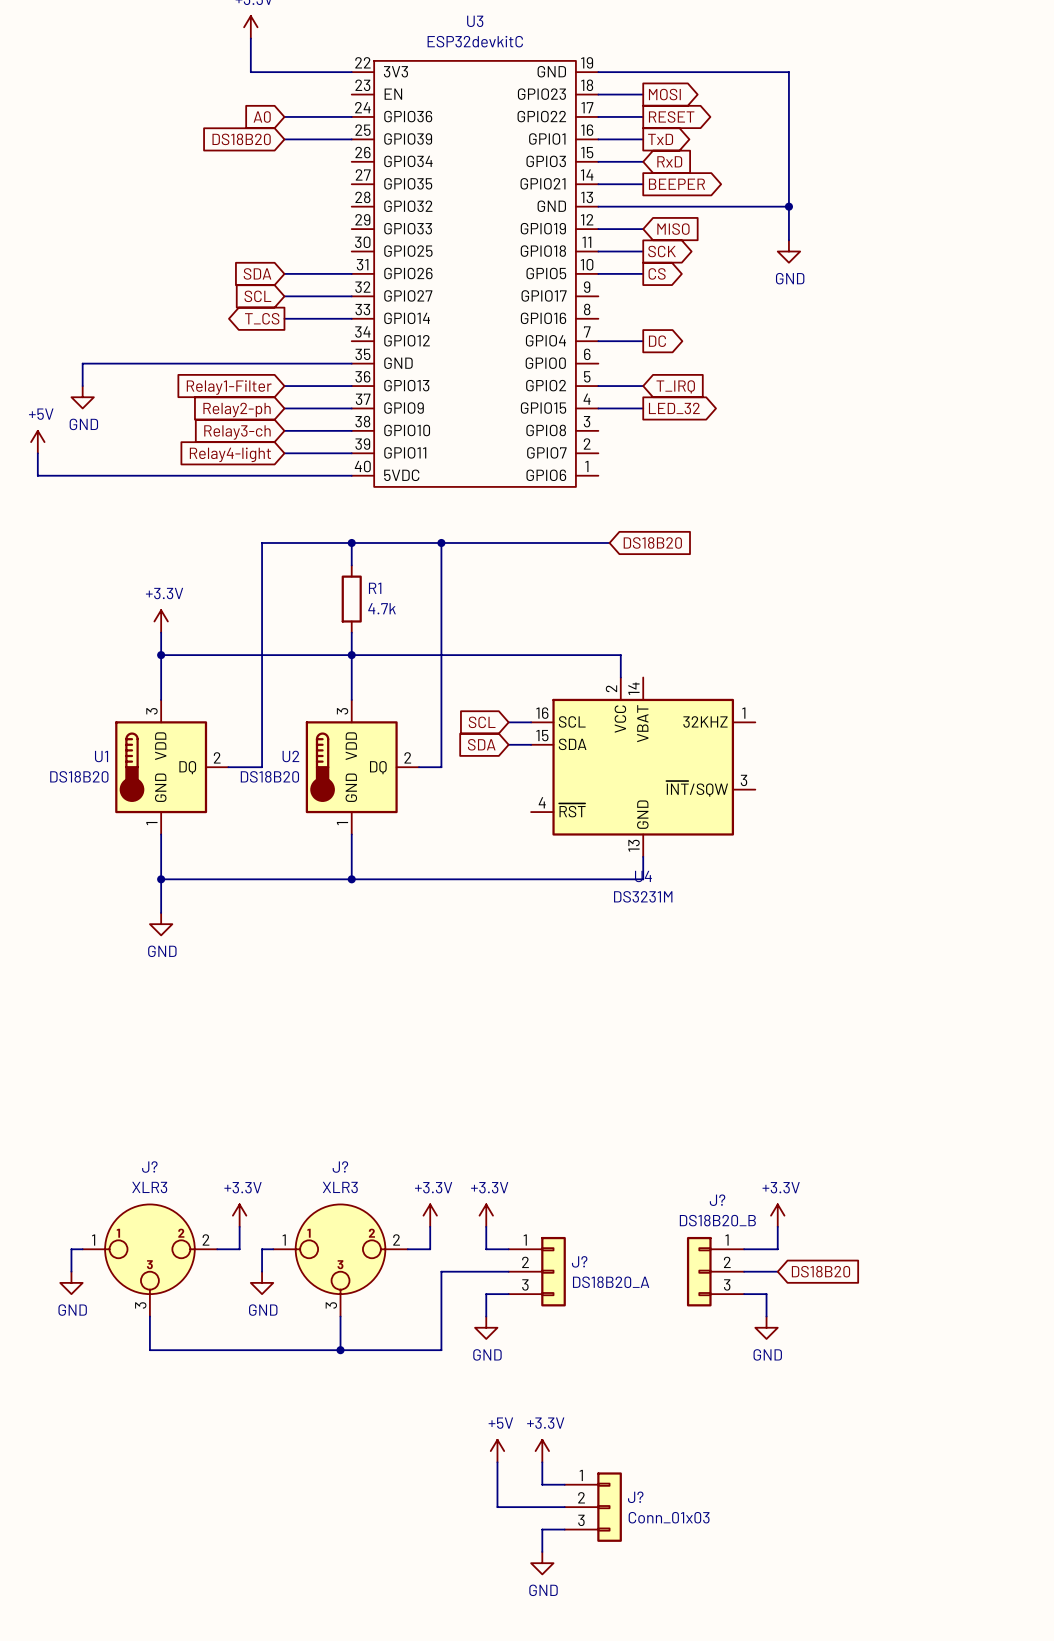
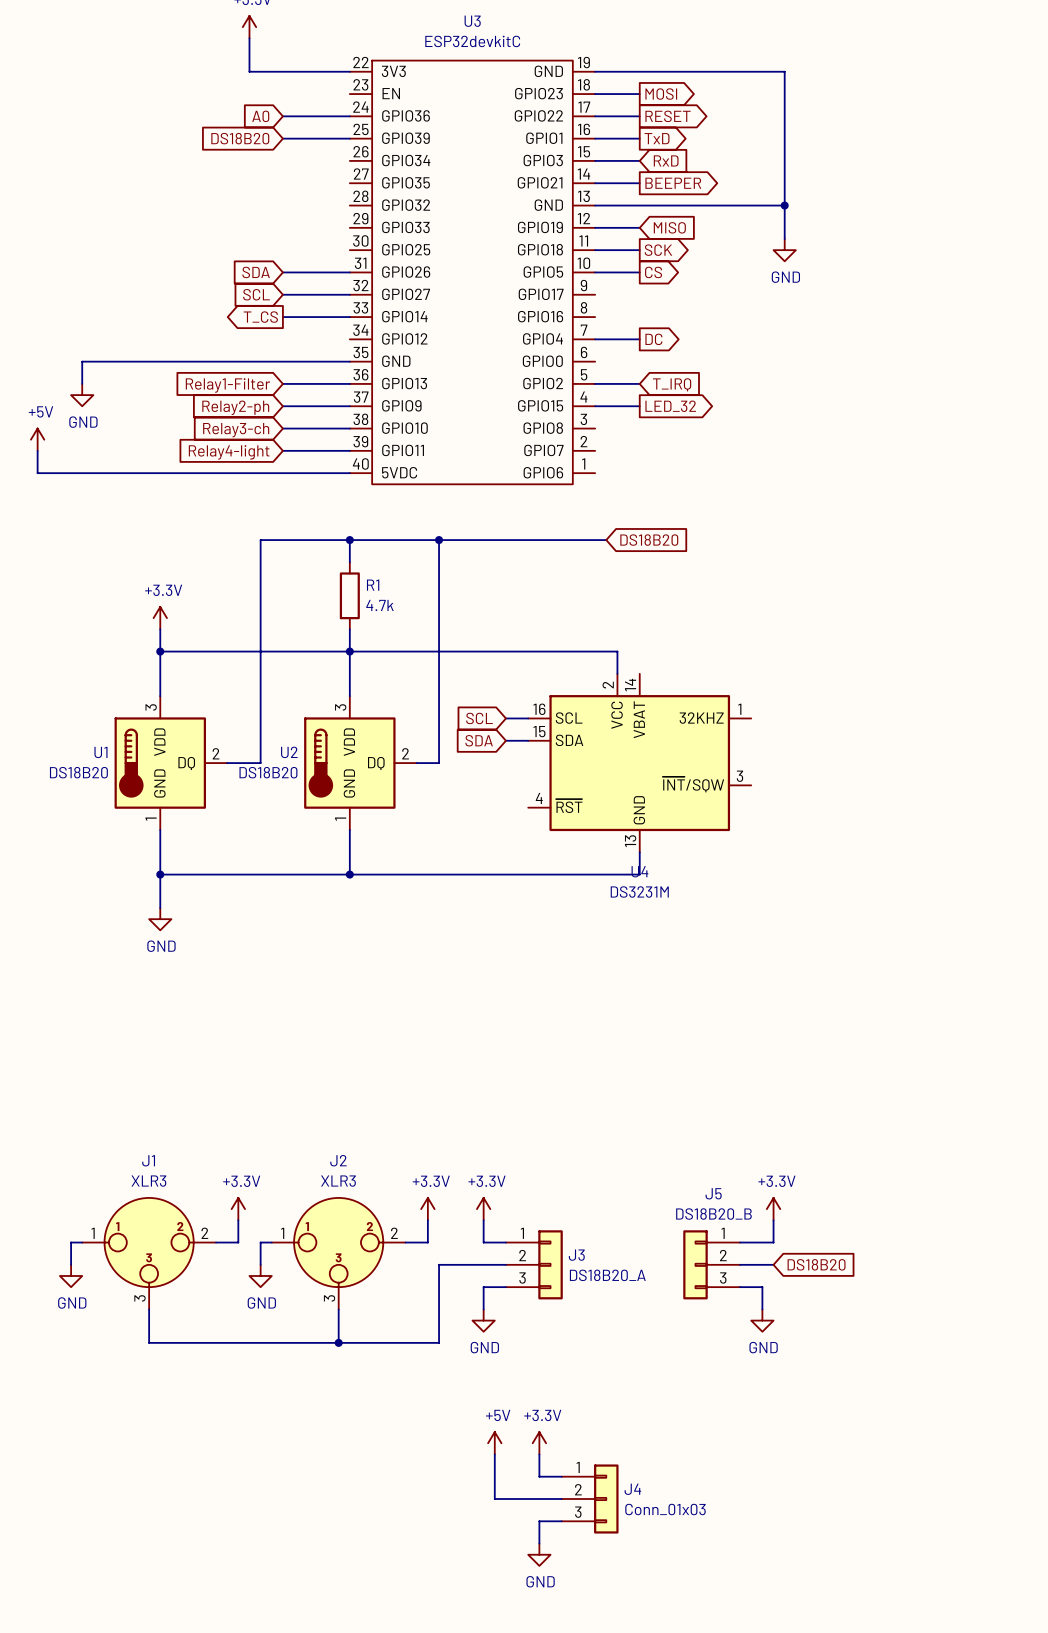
J? name: J? (149, 1167) -> J1 (148, 1160)
J? name: J? (340, 1167) -> J2 (338, 1160)
J? name: J? (717, 1200) -> J5 (713, 1193)
J? name: J? (579, 1261) -> J3 (576, 1255)
J? name: J? (635, 1497) -> J4 (632, 1489)

